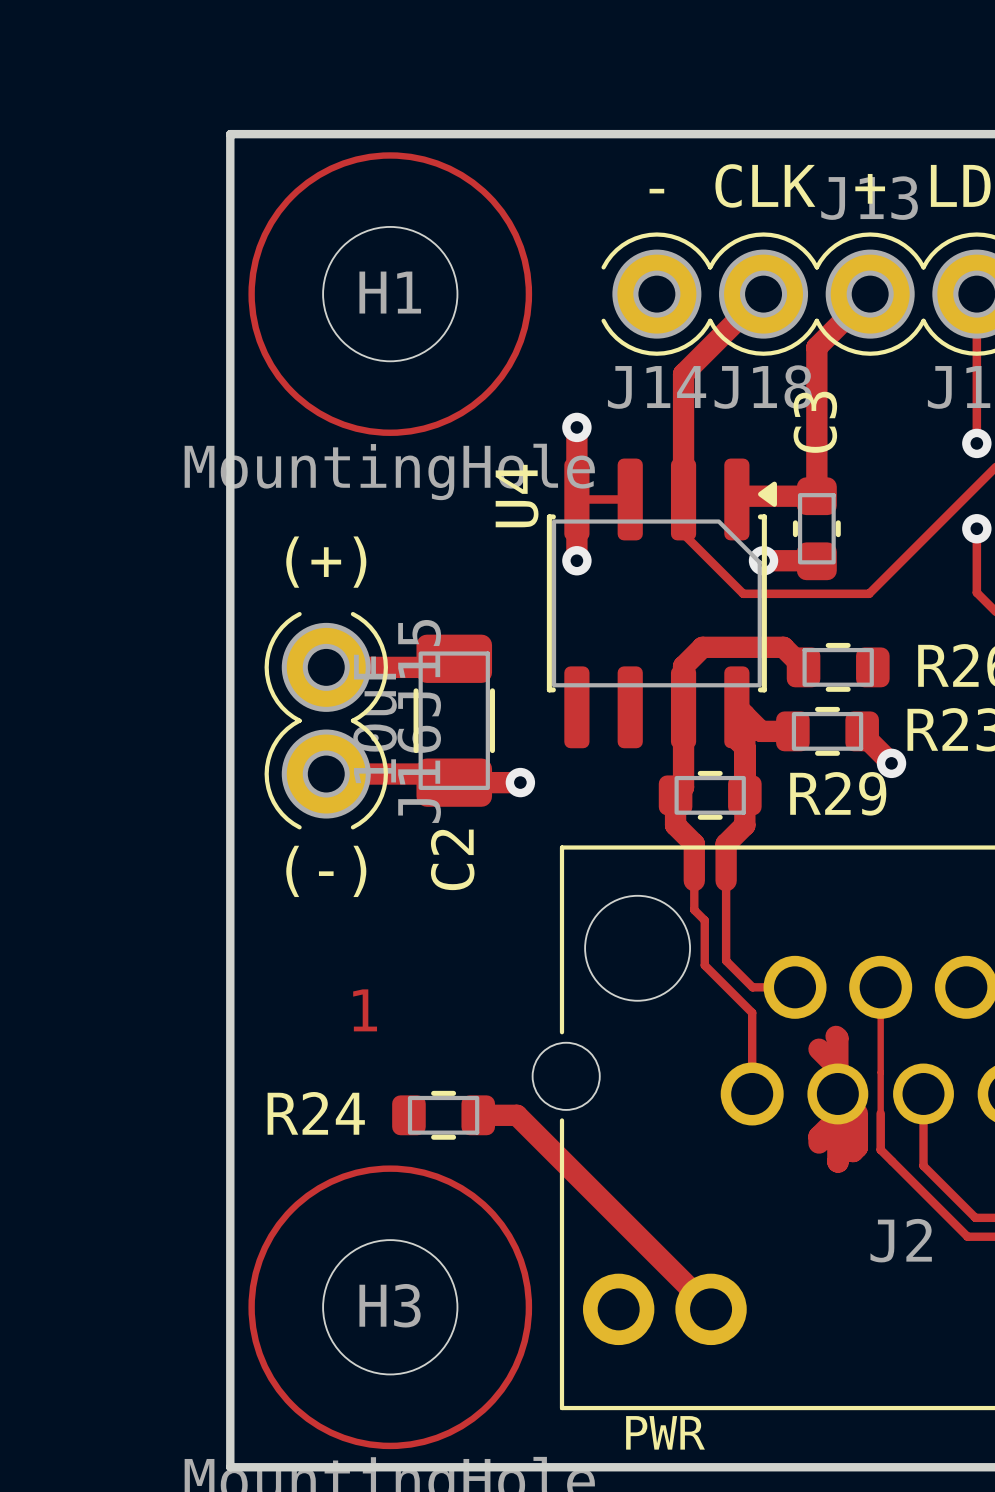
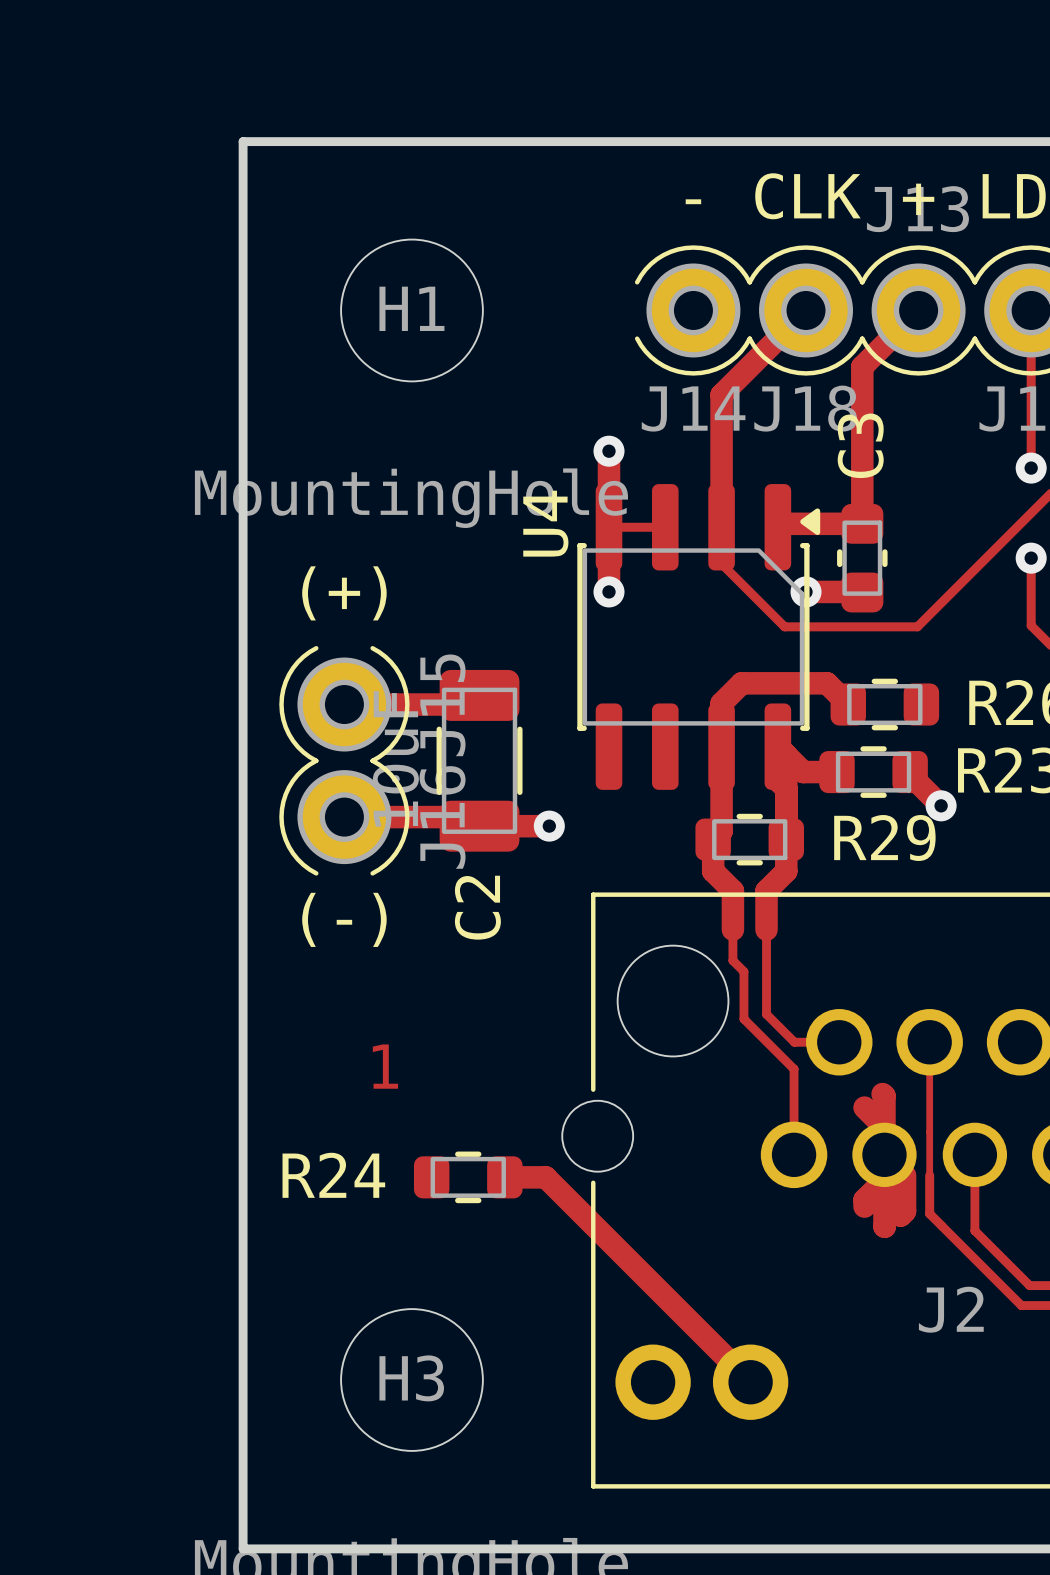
drawing: [248, 152, 533, 436] -> none
drawing: [248, 1165, 533, 1450] -> none
text: PWR (665, 1432) -> none

